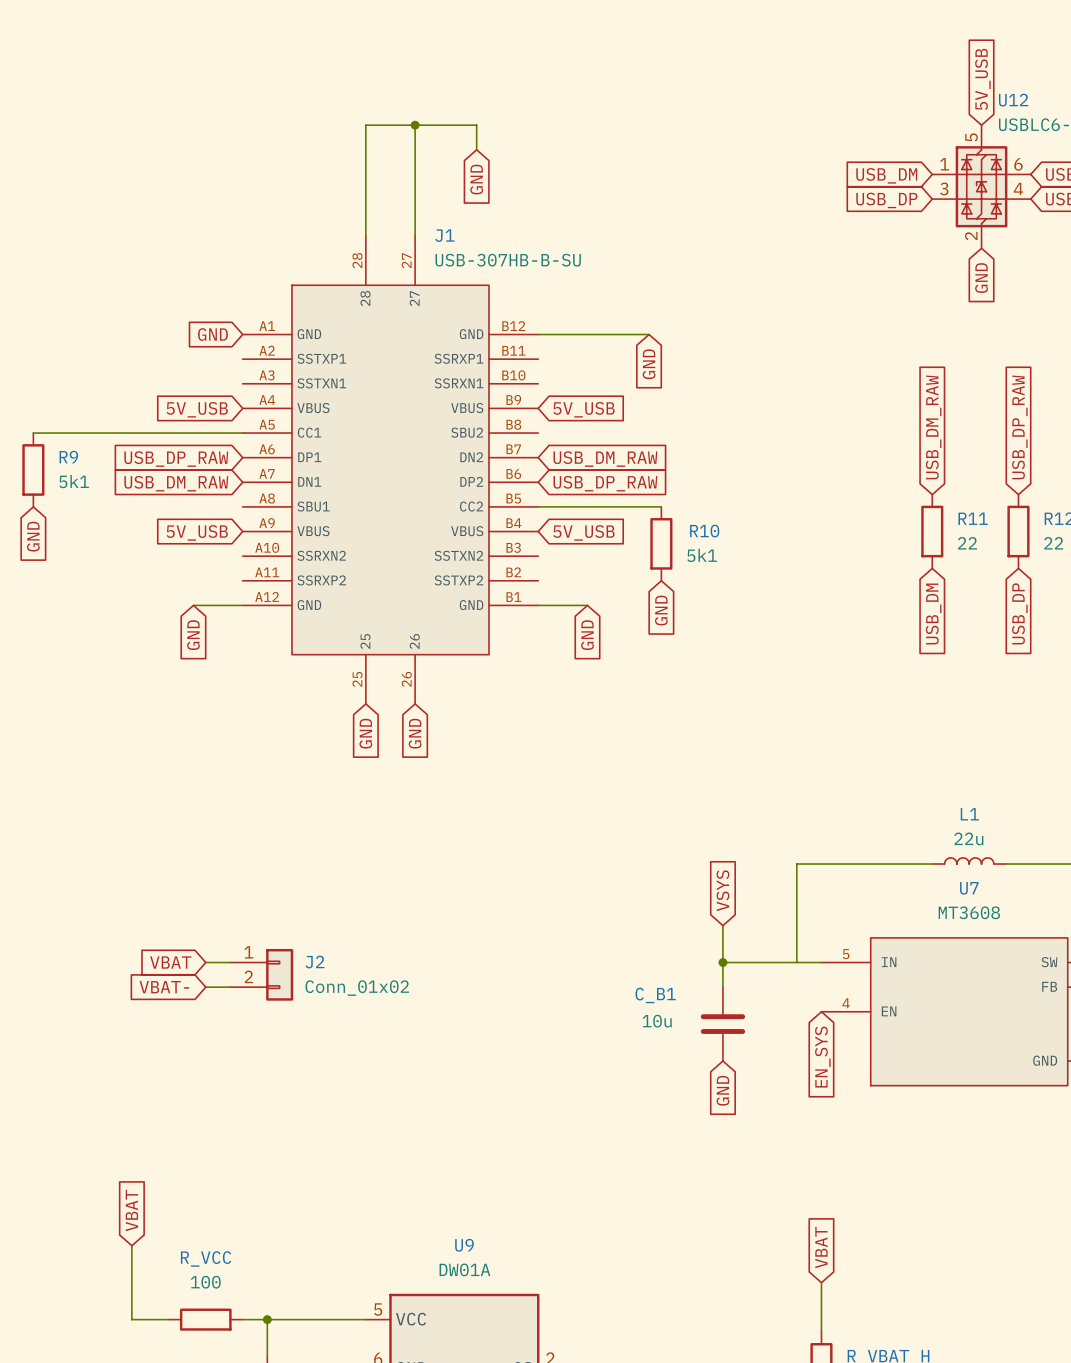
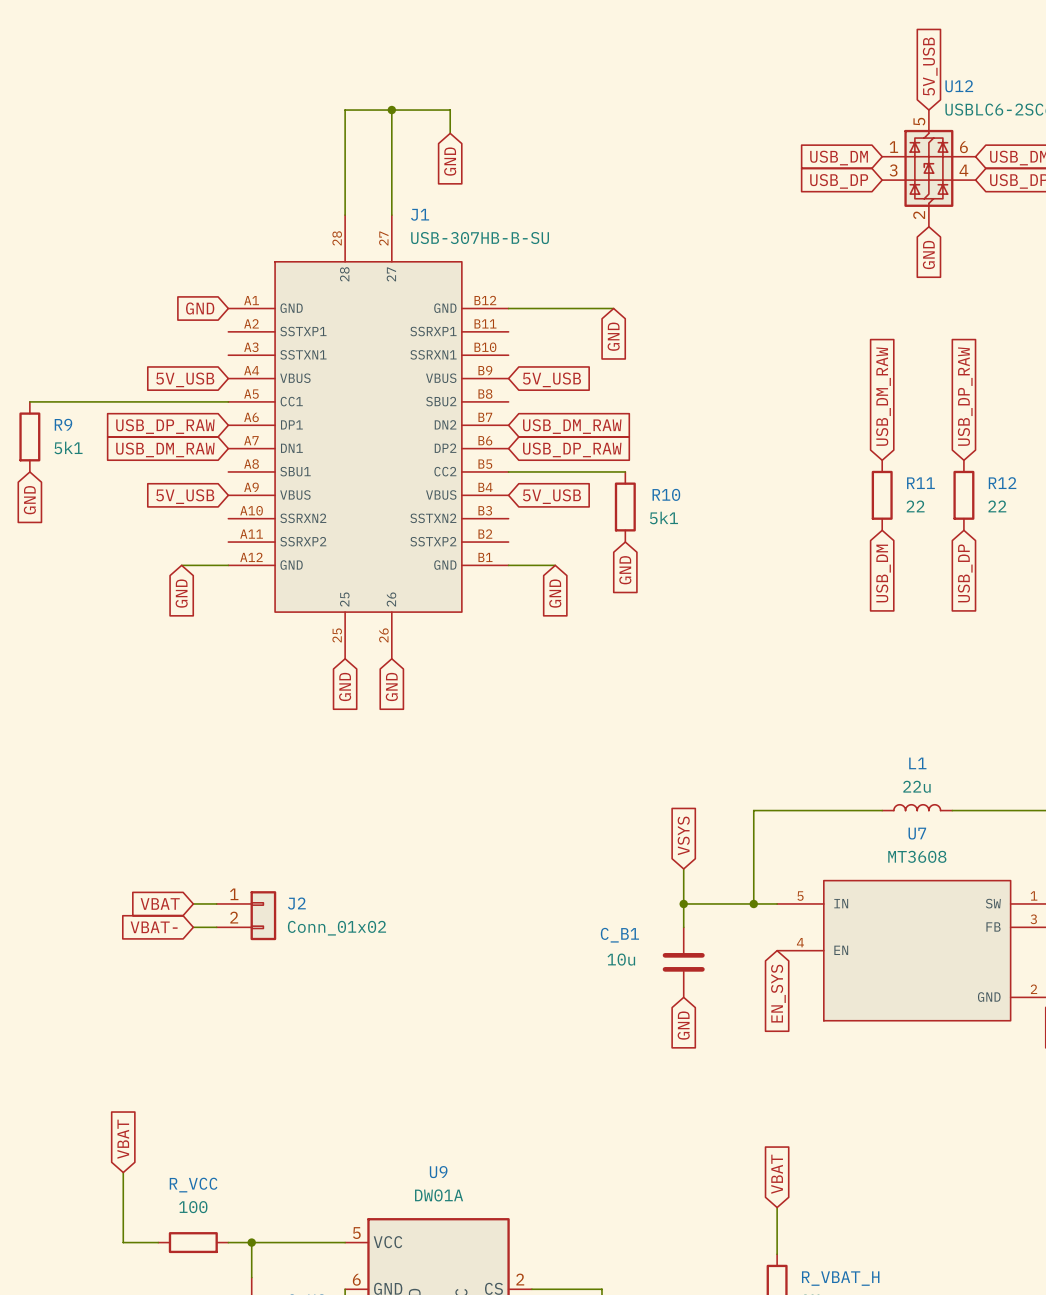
junction: none -> (753, 903)

